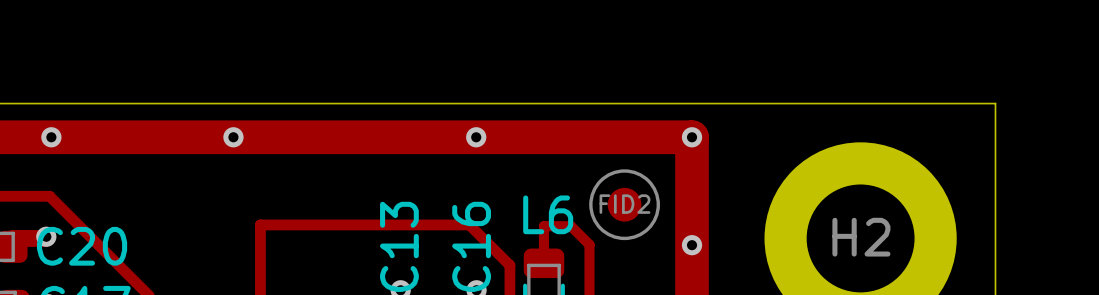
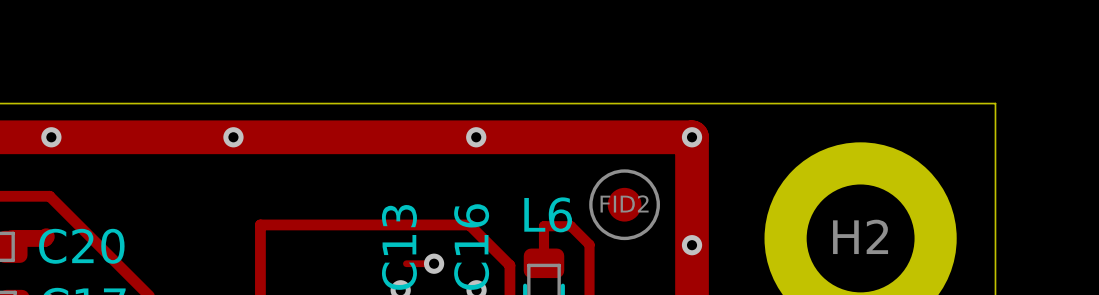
via: (46, 236) -> none
top track: none -> (406, 263) (434, 263)
via: none -> (434, 263)

